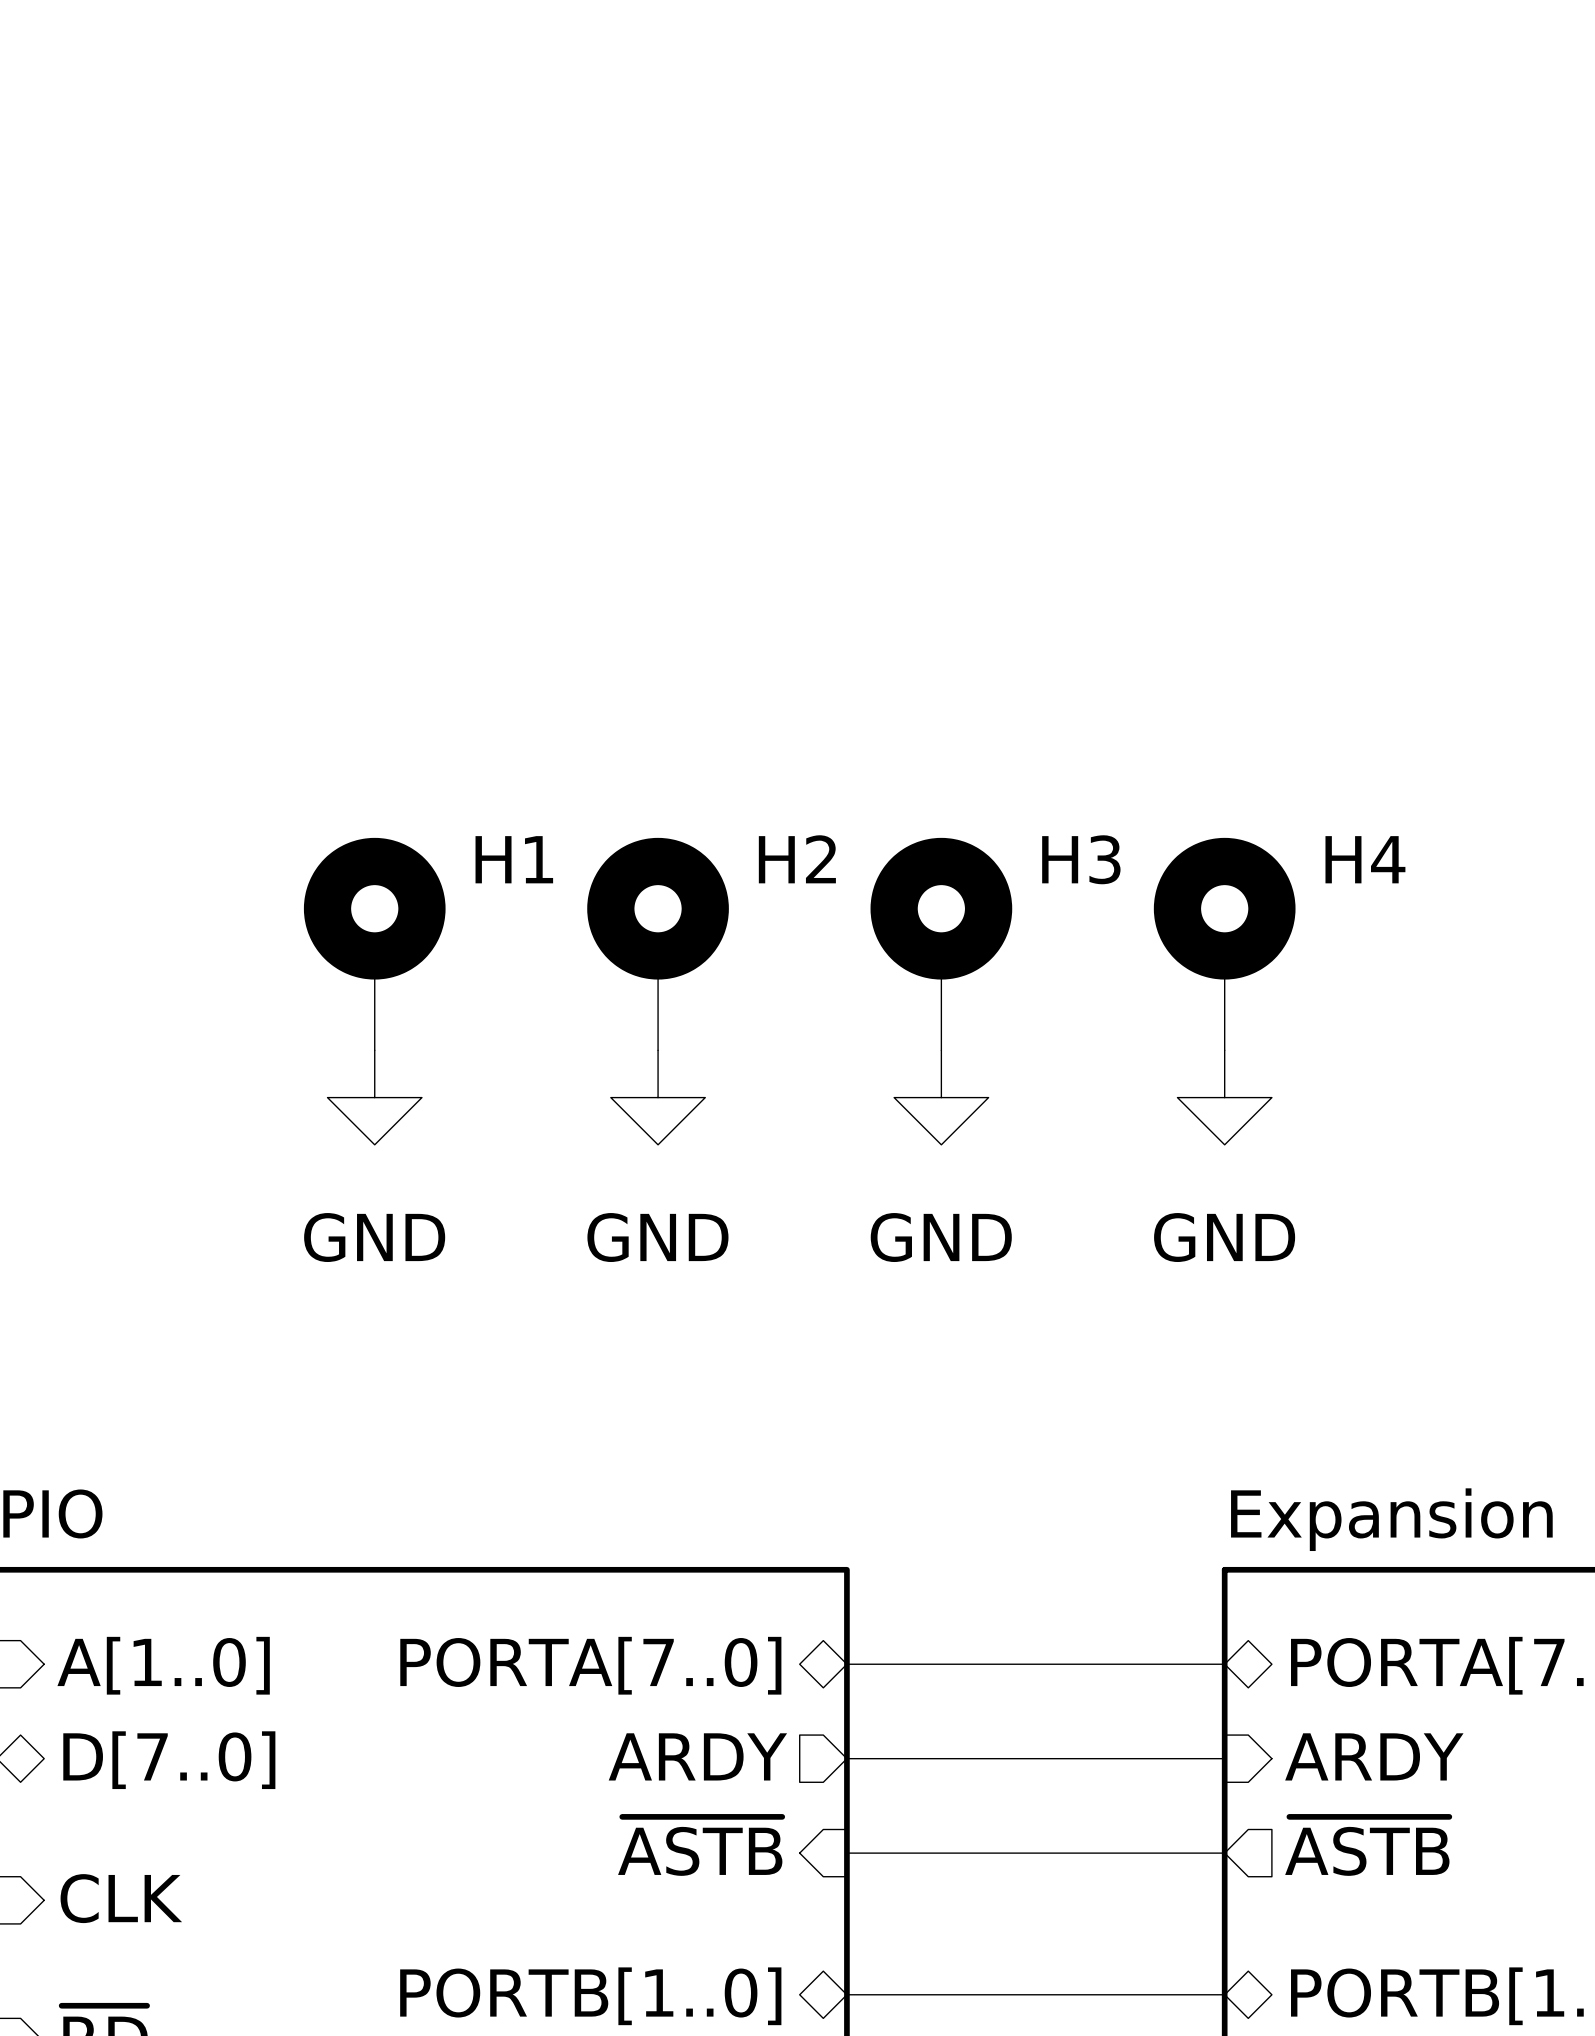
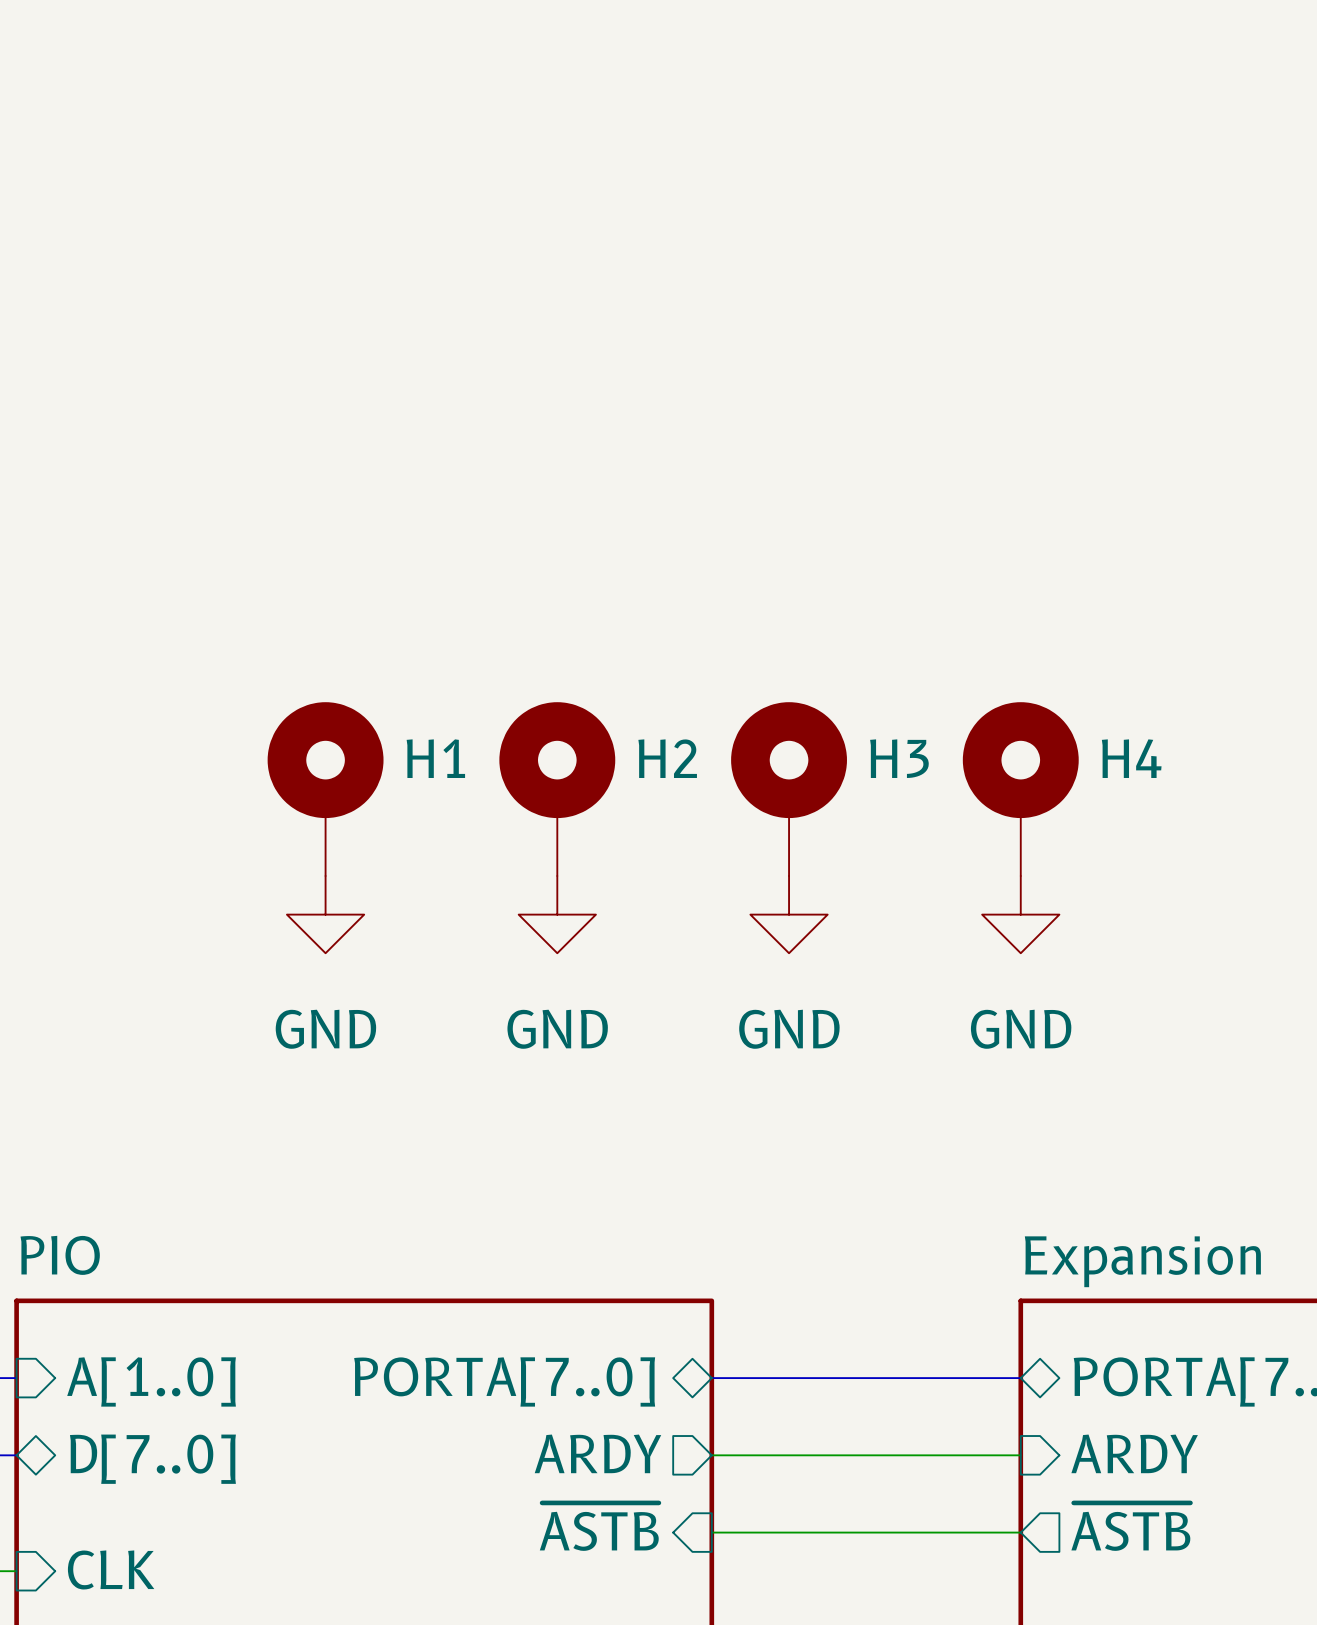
H1 name position: H1 (514, 859) -> H1 (435, 758)
H2 name position: H2 (797, 859) -> H2 (667, 758)
H3 name position: H3 (1081, 859) -> H3 (899, 758)
H4 name position: H4 (1365, 859) -> H4 (1131, 758)

